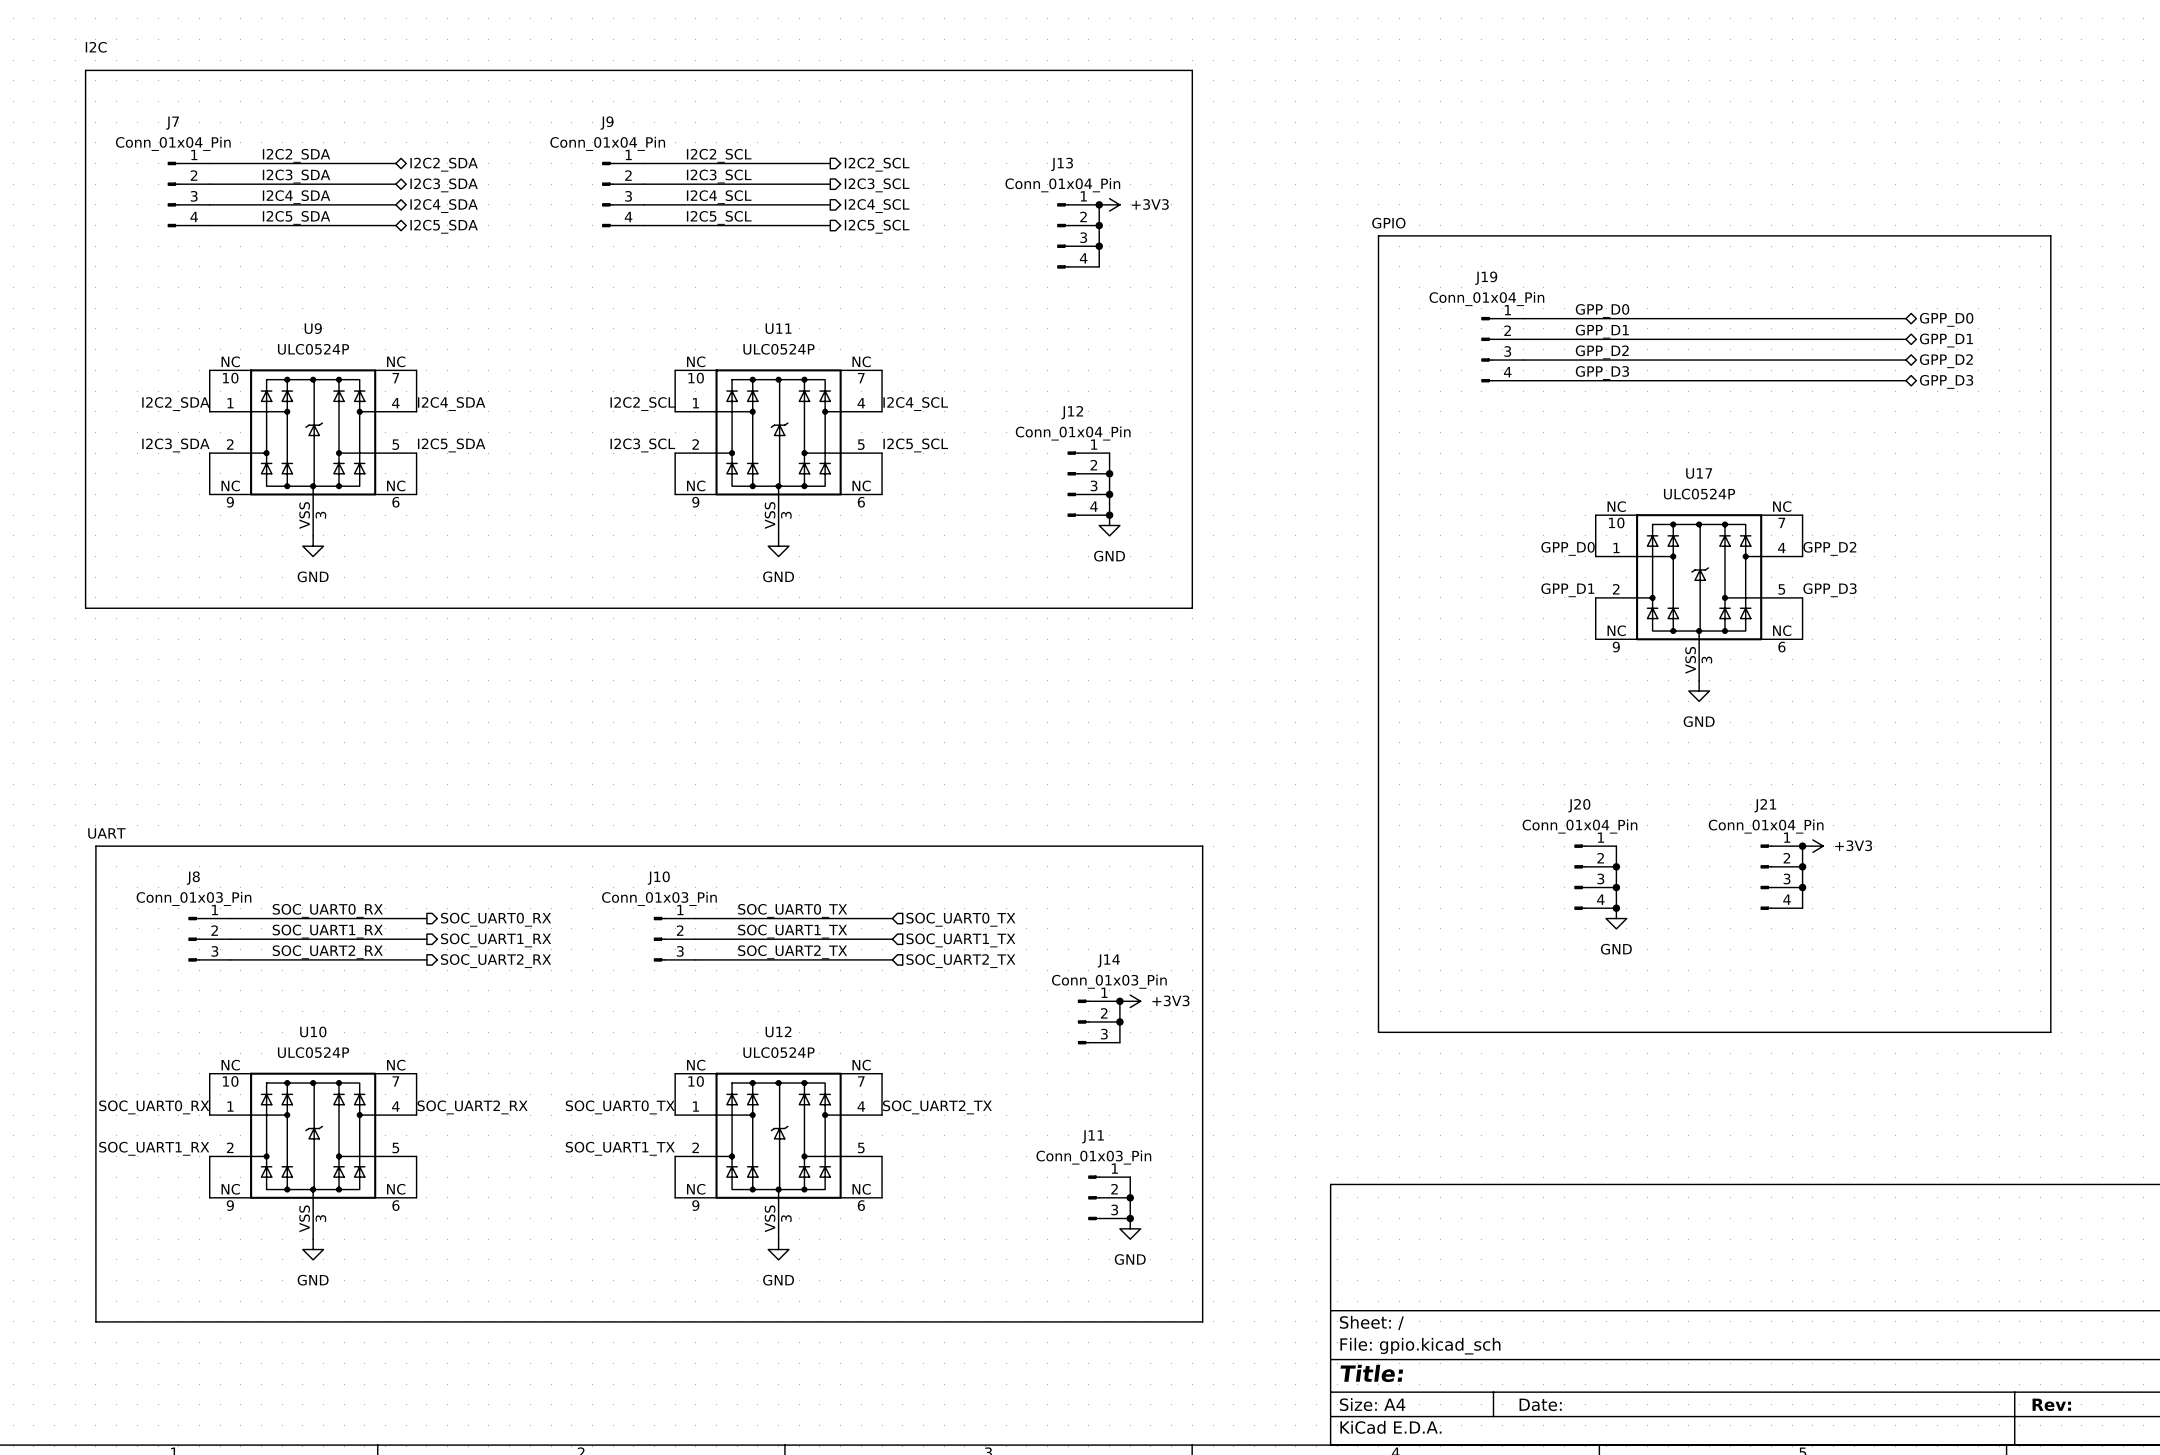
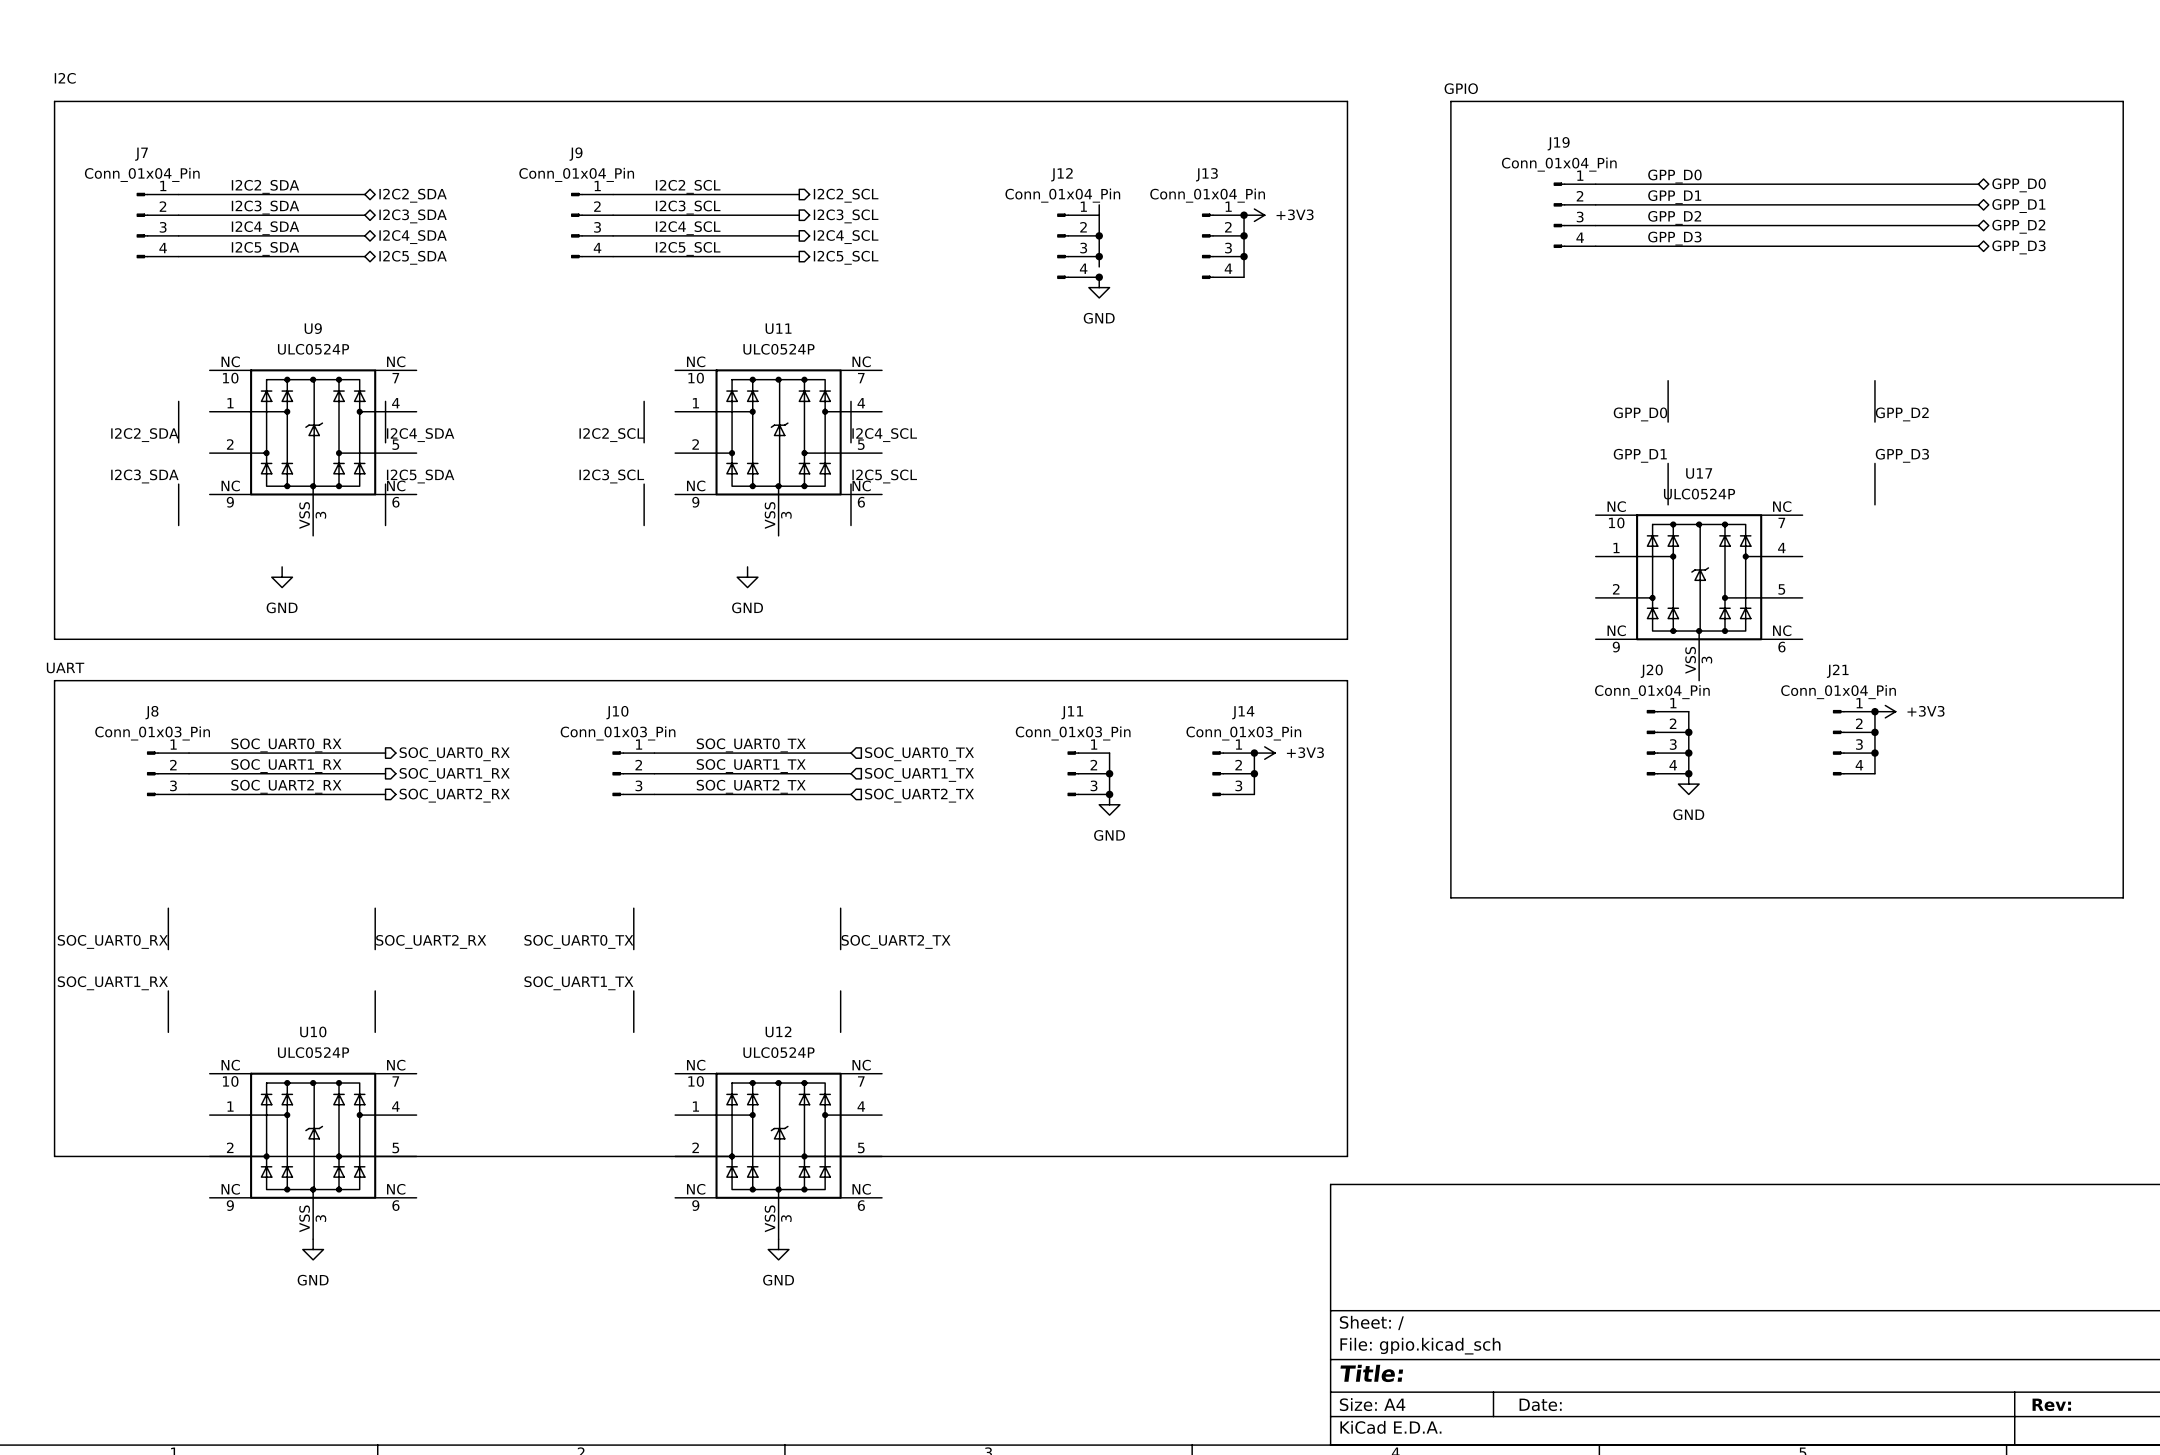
text position: I2C (96, 47) -> I2C (65, 78)
line: (85, 70) (1192, 70) (1192, 608) (85, 608) (85, 70) -> (54, 101) (54, 639) (1347, 639) (1347, 101) (54, 101)
label position: I2C2_SDA (296, 155) -> I2C2_SDA (265, 186)
label position: I2C2_SCL (719, 155) -> I2C2_SCL (688, 186)
wire: (209, 163) (395, 163) -> (178, 194) (364, 194)
wire: (644, 163) (830, 163) -> (613, 194) (799, 194)
hierarchical label position: I2C2_SDA (444, 164) -> I2C2_SDA (413, 195)
hierarchical label position: I2C2_SCL (877, 164) -> I2C2_SCL (846, 195)
label position: I2C3_SDA (296, 176) -> I2C3_SDA (265, 207)
label position: I2C3_SCL (719, 176) -> I2C3_SCL (688, 207)
label: none -> GPP_D0 (1674, 176)
wire: (209, 184) (395, 184) -> (178, 215) (364, 215)
wire: (644, 184) (830, 184) -> (613, 215) (799, 215)
hierarchical label position: I2C3_SDA (444, 185) -> I2C3_SDA (413, 216)
hierarchical label position: I2C3_SCL (877, 185) -> I2C3_SCL (846, 216)
J7 position: (188, 194) -> (157, 225)
J9 position: (623, 194) -> (592, 225)
label position: I2C4_SDA (296, 197) -> I2C4_SDA (265, 228)
label position: I2C4_SCL (719, 197) -> I2C4_SCL (688, 228)
label: none -> GPP_D1 (1674, 197)
wire: (209, 204) (395, 204) -> (178, 235) (364, 235)
wire: (644, 204) (830, 204) -> (613, 235) (799, 235)
junction: (1099, 204) -> none
power symbol position: +3V3 (1109, 204) -> +3V3 (1254, 215)
hierarchical label position: I2C4_SDA (444, 206) -> I2C4_SDA (413, 237)
hierarchical label position: I2C4_SCL (877, 206) -> I2C4_SCL (846, 237)
wire: none -> (1244, 215) (1244, 277)
junction: none -> (1244, 215)
label position: I2C5_SDA (296, 217) -> I2C5_SDA (265, 248)
label position: I2C5_SCL (719, 217) -> I2C5_SCL (688, 248)
text position: GPIO (1388, 223) -> GPIO (1461, 88)
wire: (209, 225) (395, 225) -> (178, 256) (364, 256)
wire: (644, 225) (830, 225) -> (613, 256) (799, 256)
junction: (1099, 225) -> none
hierarchical label position: I2C5_SDA (444, 226) -> I2C5_SDA (413, 257)
hierarchical label position: I2C5_SCL (877, 226) -> I2C5_SCL (846, 257)
J13 position: (1078, 235) -> (1223, 246)
junction: none -> (1099, 235)
junction: none -> (1244, 235)
line: (1378, 235) (2050, 235) (2050, 1032) (1378, 1032) (1378, 235) -> (1450, 101) (2123, 101) (2123, 897) (1450, 897) (1450, 101)
junction: (1099, 246) -> none
junction: none -> (1099, 256)
junction: none -> (1244, 256)
junction: none -> (1099, 277)
power symbol: none -> GND (1099, 287)
label: GPP_D0 (1602, 310) -> none
wire: (1523, 318) (1906, 318) -> (1595, 184) (1978, 184)
hierarchical label position: GPP_D0 (1946, 319) -> GPP_D0 (2019, 185)
label: GPP_D1 (1602, 331) -> none
wire: (1523, 339) (1906, 339) -> (1595, 204) (1978, 204)
hierarchical label position: GPP_D1 (1946, 340) -> GPP_D1 (2018, 206)
J19 position: (1502, 349) -> (1574, 215)
label position: GPP_D2 (1602, 352) -> GPP_D2 (1674, 217)
wire: (1523, 360) (1906, 360) -> (1595, 225) (1978, 225)
hierarchical label position: GPP_D2 (1946, 361) -> GPP_D2 (2018, 226)
wire: (209, 370) (209, 411) -> (178, 401) (178, 442)
wire: (416, 370) (416, 411) -> (385, 401) (385, 442)
wire: (675, 370) (675, 411) -> (644, 401) (644, 442)
wire: (882, 370) (882, 411) -> (850, 401) (850, 442)
label position: GPP_D3 (1602, 373) -> GPP_D3 (1674, 238)
wire: (1523, 380) (1906, 380) -> (1595, 246) (1978, 246)
hierarchical label position: GPP_D3 (1946, 381) -> GPP_D3 (2018, 247)
label position: I2C2_SDA (175, 404) -> I2C2_SDA (144, 435)
label position: I2C4_SDA (451, 404) -> I2C4_SDA (420, 435)
label position: I2C2_SCL (642, 404) -> I2C2_SCL (611, 435)
label position: I2C4_SCL (915, 404) -> I2C4_SCL (884, 435)
label: none -> GPP_D0 (1640, 414)
label position: I2C3_SDA (175, 445) -> I2C3_SDA (144, 476)
label position: I2C5_SDA (451, 445) -> I2C5_SDA (420, 476)
label position: I2C3_SCL (642, 445) -> I2C3_SCL (611, 476)
label position: I2C5_SCL (915, 445) -> I2C5_SCL (884, 476)
wire: (209, 453) (209, 494) -> (178, 484) (178, 525)
wire: (416, 453) (416, 494) -> (385, 484) (385, 525)
wire: (675, 453) (675, 494) -> (644, 484) (644, 525)
wire: (882, 453) (882, 494) -> (850, 484) (850, 525)
wire: (1109, 453) (1109, 515) -> none
label: none -> GPP_D1 (1640, 455)
junction: (1109, 473) -> none
J12 position: (1088, 484) -> (1078, 246)
junction: (1109, 494) -> none
junction: (1109, 515) -> none
wire: (1595, 515) (1595, 556) -> (1668, 380) (1668, 422)
wire: (1802, 515) (1802, 556) -> (1874, 380) (1874, 422)
power symbol: GND (1109, 525) -> none
power symbol position: GND (313, 546) -> GND (282, 577)
power symbol position: GND (778, 546) -> GND (747, 577)
label: GPP_D0 (1568, 548) -> none
label position: GPP_D2 (1829, 548) -> GPP_D2 (1902, 414)
label: GPP_D1 (1567, 590) -> none
label position: GPP_D3 (1829, 590) -> GPP_D3 (1902, 455)
wire: (1595, 597) (1595, 639) -> (1668, 463) (1668, 504)
wire: (1802, 597) (1802, 639) -> (1874, 463) (1874, 504)
line: none -> (54, 680) (54, 1156) (1347, 1156) (1347, 680) (54, 680)
power symbol: GND (1699, 691) -> none
junction: none -> (1874, 711)
junction: none -> (1688, 732)
junction: none -> (1874, 732)
label: none -> SOC_UART0_RX (286, 745)
label: none -> SOC_UART0_TX (751, 745)
wire: none -> (1109, 753) (1109, 794)
wire: none -> (1254, 753) (1254, 794)
junction: none -> (1254, 753)
power symbol: none -> +3V3 (1264, 753)
junction: none -> (1688, 753)
junction: none -> (1874, 753)
label: none -> SOC_UART1_RX (286, 766)
label: none -> SOC_UART1_TX (751, 766)
junction: none -> (1109, 773)
junction: none -> (1254, 773)
junction: none -> (1688, 773)
power symbol: none -> GND (1688, 784)
label: none -> SOC_UART2_RX (286, 786)
label: none -> SOC_UART2_TX (751, 786)
junction: none -> (1109, 794)
power symbol: none -> GND (1109, 804)
text position: UART (106, 833) -> UART (65, 667)
line: (95, 846) (1202, 846) (1202, 1321) (95, 1321) (95, 846) -> none
wire: (1616, 846) (1616, 908) -> (1688, 711) (1688, 773)
wire: (1802, 846) (1802, 908) -> (1874, 711) (1874, 773)
junction: (1802, 846) -> none
power symbol position: +3V3 (1812, 846) -> +3V3 (1885, 711)
junction: (1616, 866) -> none
junction: (1802, 866) -> none
J20 position: (1595, 877) -> (1667, 742)
J21 position: (1781, 877) -> (1853, 742)
junction: (1616, 887) -> none
junction: (1802, 887) -> none
junction: (1616, 908) -> none
label: SOC_UART0_RX (327, 910) -> none
label: SOC_UART0_TX (792, 910) -> none
wire: (230, 918) (426, 918) -> (189, 753) (385, 753)
wire: (695, 918) (892, 918) -> (654, 753) (850, 753)
power symbol: GND (1616, 918) -> none
hierarchical label position: SOC_UART0_RX (496, 919) -> SOC_UART0_RX (454, 754)
hierarchical label position: SOC_UART0_TX (960, 919) -> SOC_UART0_TX (919, 754)
label: SOC_UART1_RX (327, 931) -> none
label: SOC_UART1_TX (792, 931) -> none
J8 position: (209, 939) -> (168, 773)
wire: (230, 939) (426, 939) -> (189, 773) (385, 773)
J10 position: (674, 939) -> (633, 773)
wire: (695, 939) (892, 939) -> (654, 773) (850, 773)
hierarchical label position: SOC_UART1_RX (496, 940) -> SOC_UART1_RX (454, 774)
hierarchical label position: SOC_UART1_TX (960, 940) -> SOC_UART1_TX (919, 774)
label: none -> SOC_UART0_RX (112, 941)
label: none -> SOC_UART2_RX (431, 941)
label: none -> SOC_UART0_TX (578, 941)
label: none -> SOC_UART2_TX (896, 941)
label: SOC_UART2_RX (327, 952) -> none
label: SOC_UART2_TX (792, 952) -> none
wire: (230, 959) (426, 959) -> (189, 794) (385, 794)
wire: (695, 959) (892, 959) -> (654, 794) (850, 794)
hierarchical label position: SOC_UART2_RX (496, 961) -> SOC_UART2_RX (454, 795)
hierarchical label position: SOC_UART2_TX (960, 961) -> SOC_UART2_TX (919, 795)
label: none -> SOC_UART1_RX (112, 983)
label: none -> SOC_UART1_TX (578, 983)
wire: (1119, 1001) (1119, 1042) -> none
junction: (1119, 1001) -> none
power symbol: +3V3 (1130, 1001) -> none
J14 position: (1098, 1021) -> (1233, 773)
junction: (1119, 1021) -> none
wire: (209, 1073) (209, 1115) -> (168, 908) (168, 949)
wire: (416, 1073) (416, 1115) -> (375, 908) (375, 949)
wire: (675, 1073) (675, 1115) -> (633, 908) (633, 949)
wire: (882, 1073) (882, 1115) -> (840, 908) (840, 949)
label: SOC_UART0_RX (154, 1107) -> none
label: SOC_UART2_RX (472, 1107) -> none
label: SOC_UART0_TX (620, 1107) -> none
label: SOC_UART2_TX (937, 1107) -> none
label: SOC_UART1_RX (154, 1148) -> none
label: SOC_UART1_TX (620, 1148) -> none
wire: (209, 1156) (209, 1197) -> (168, 990) (168, 1032)
wire: (416, 1156) (416, 1197) -> (375, 990) (375, 1032)
wire: (675, 1156) (675, 1197) -> (633, 990) (633, 1032)
wire: (882, 1156) (882, 1197) -> (840, 990) (840, 1032)
wire: (1130, 1177) (1130, 1218) -> none
J11 position: (1109, 1197) -> (1088, 773)
junction: (1130, 1197) -> none
junction: (1130, 1218) -> none
power symbol: GND (1130, 1228) -> none

